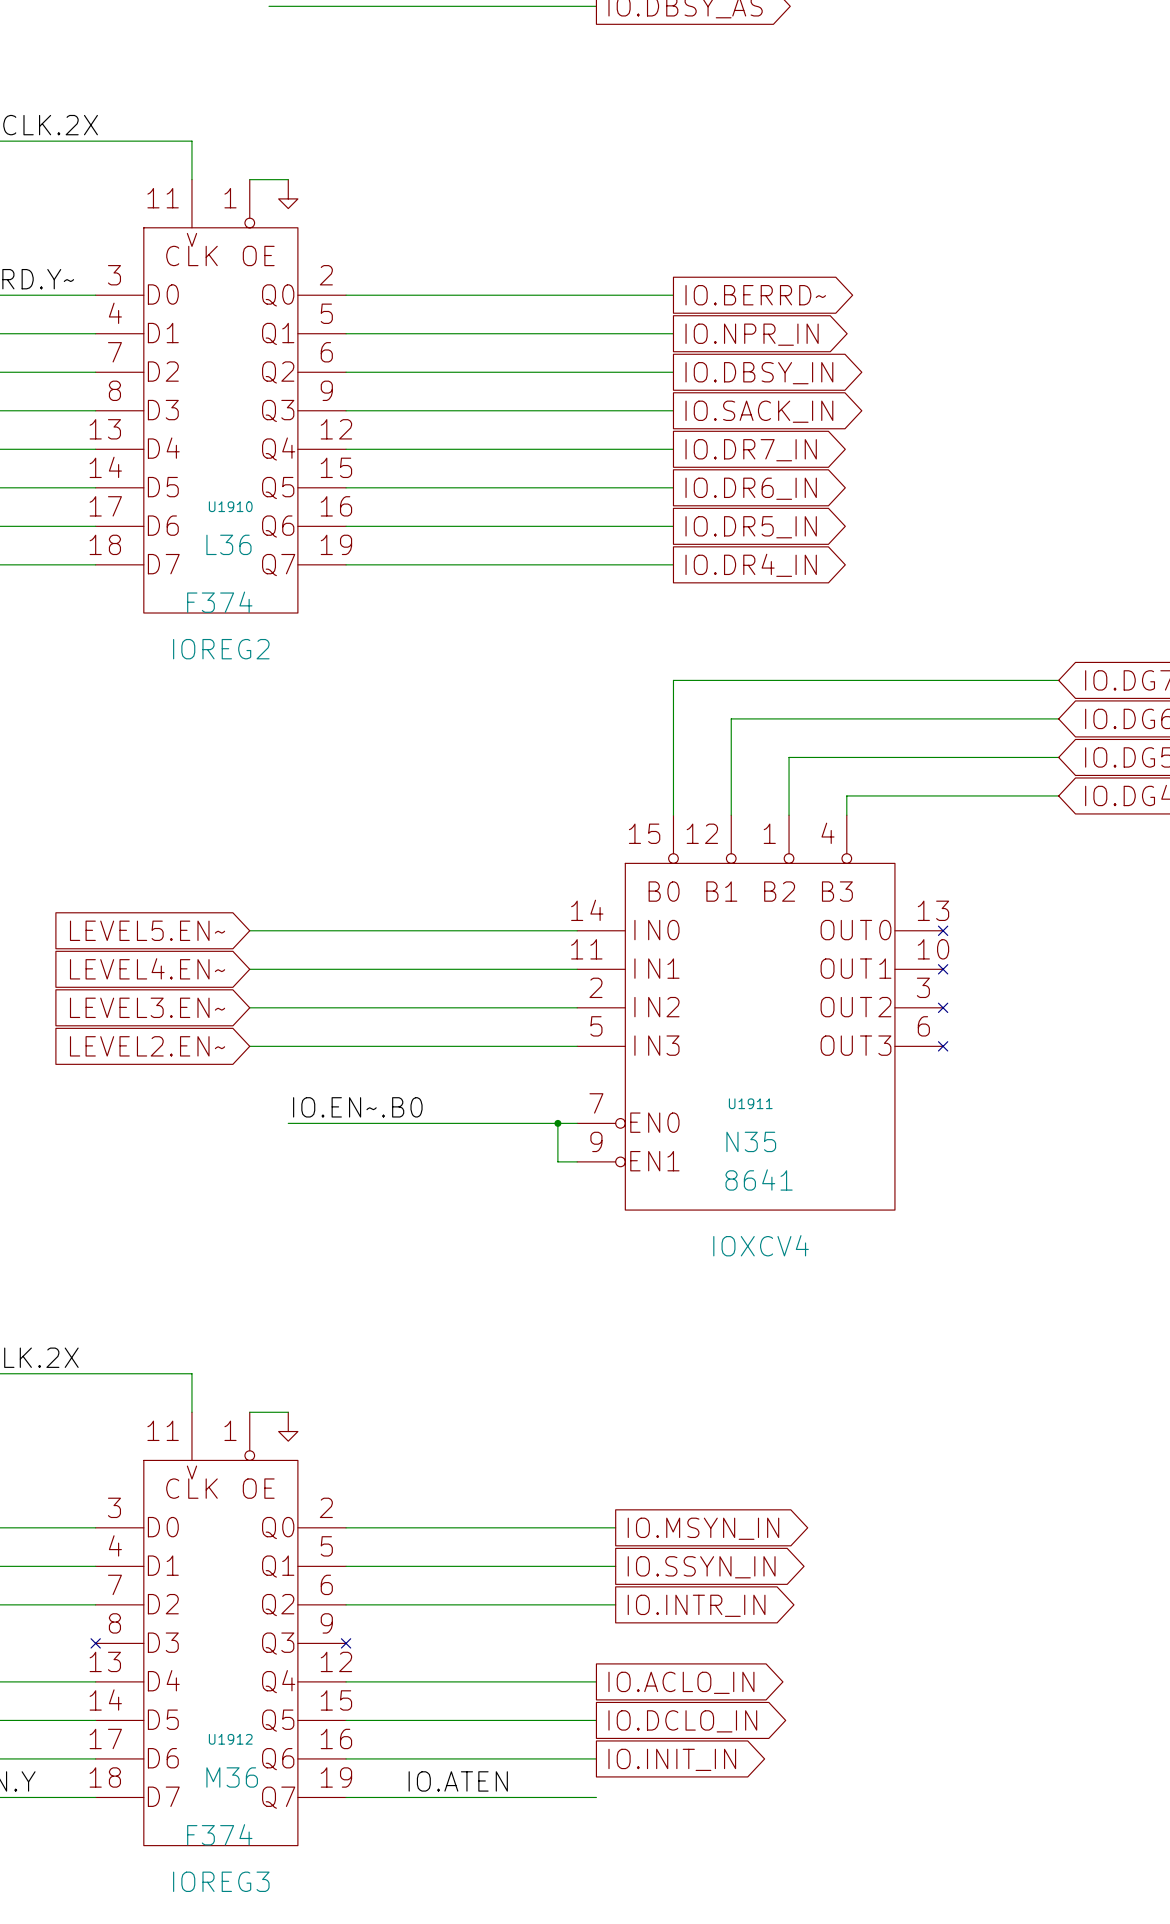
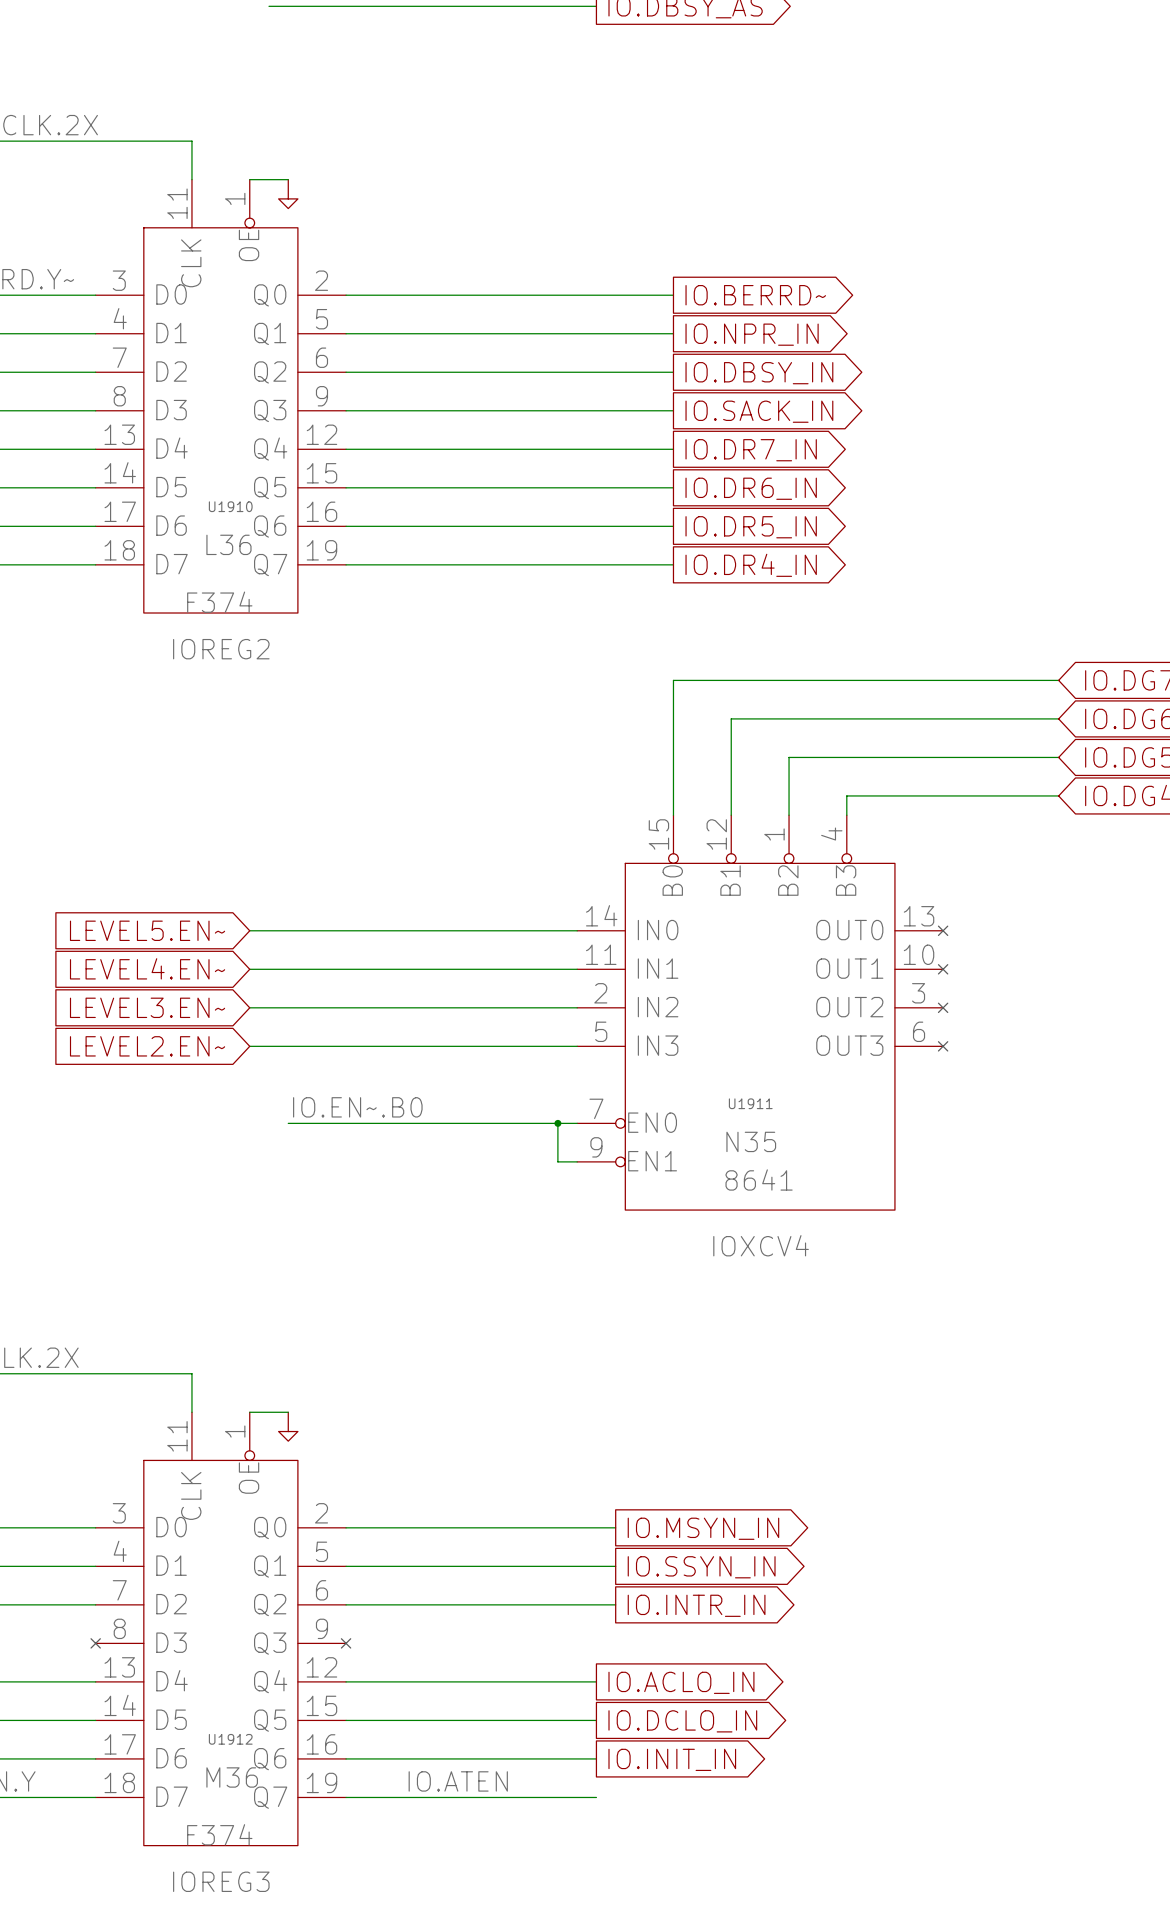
U1910 symbol: [95, 179, 347, 614] -> [95, 179, 347, 614]
U1911 symbol: [577, 815, 944, 1211] -> [577, 815, 944, 1211]
U1912 symbol: [95, 1412, 347, 1846] -> [95, 1412, 347, 1846]

